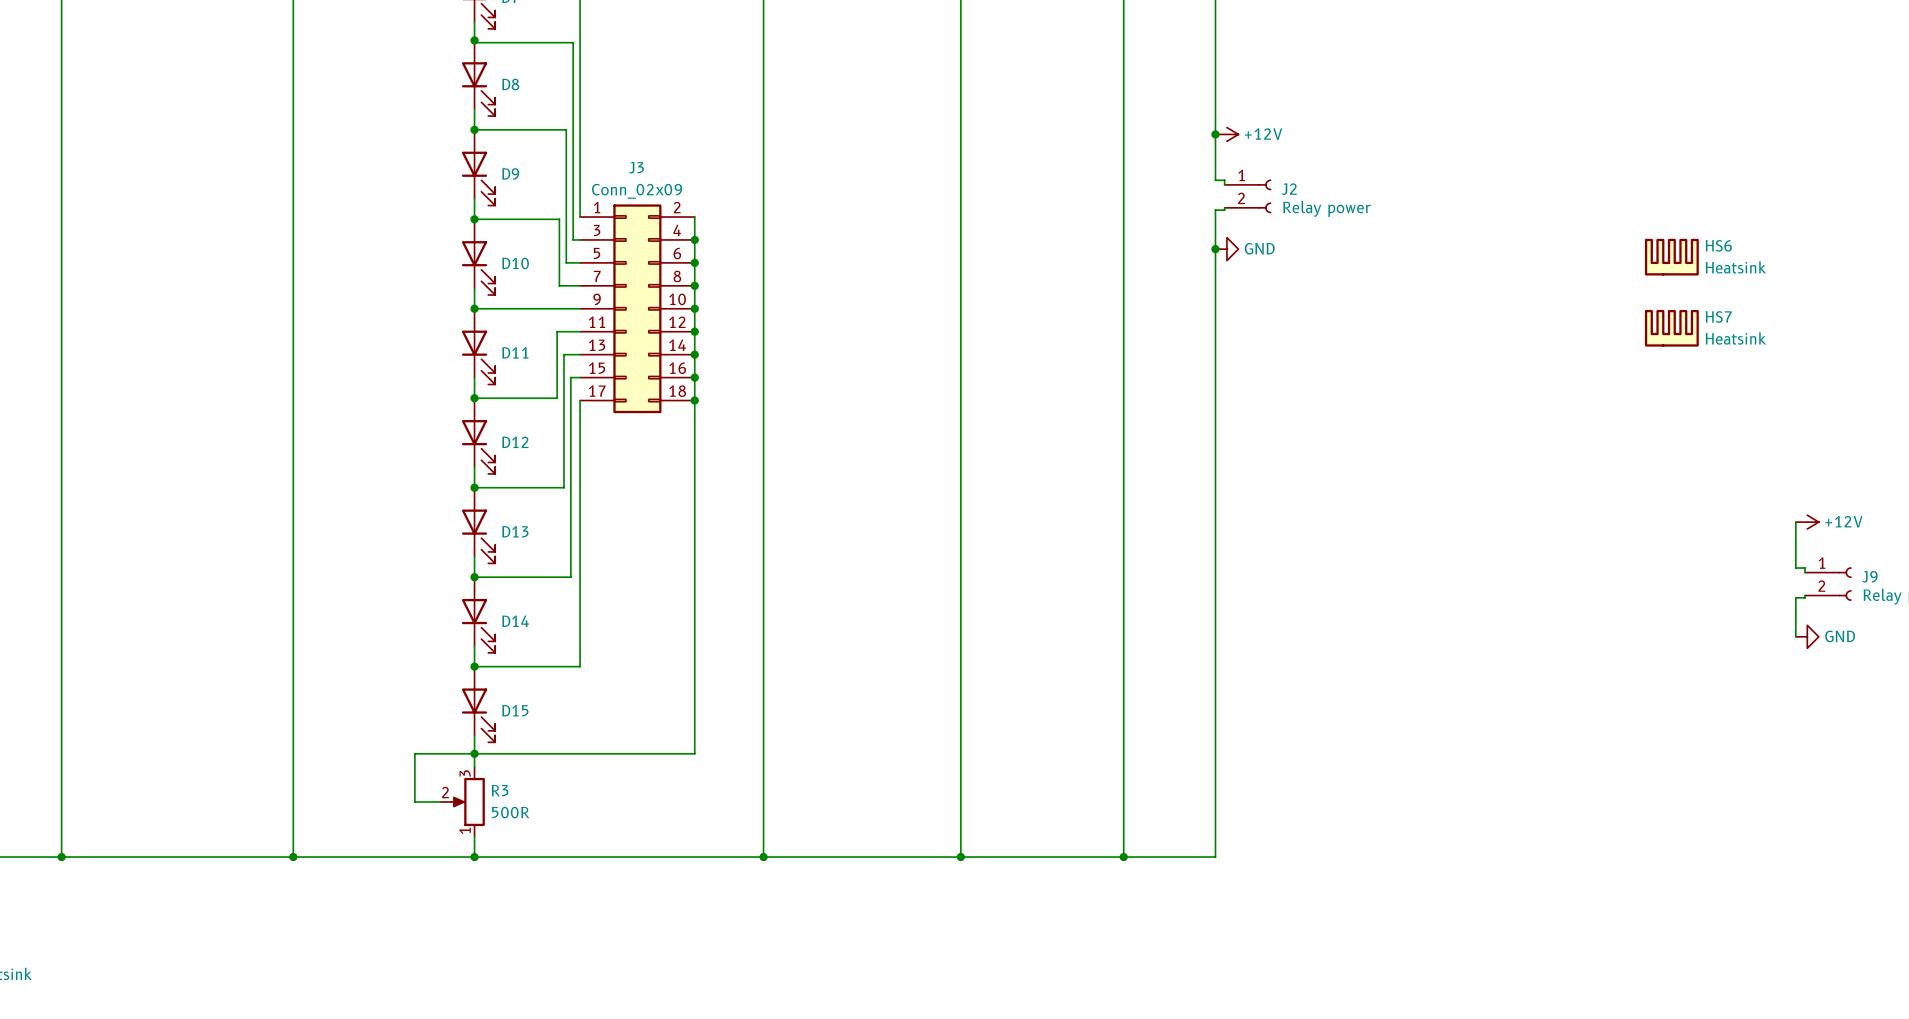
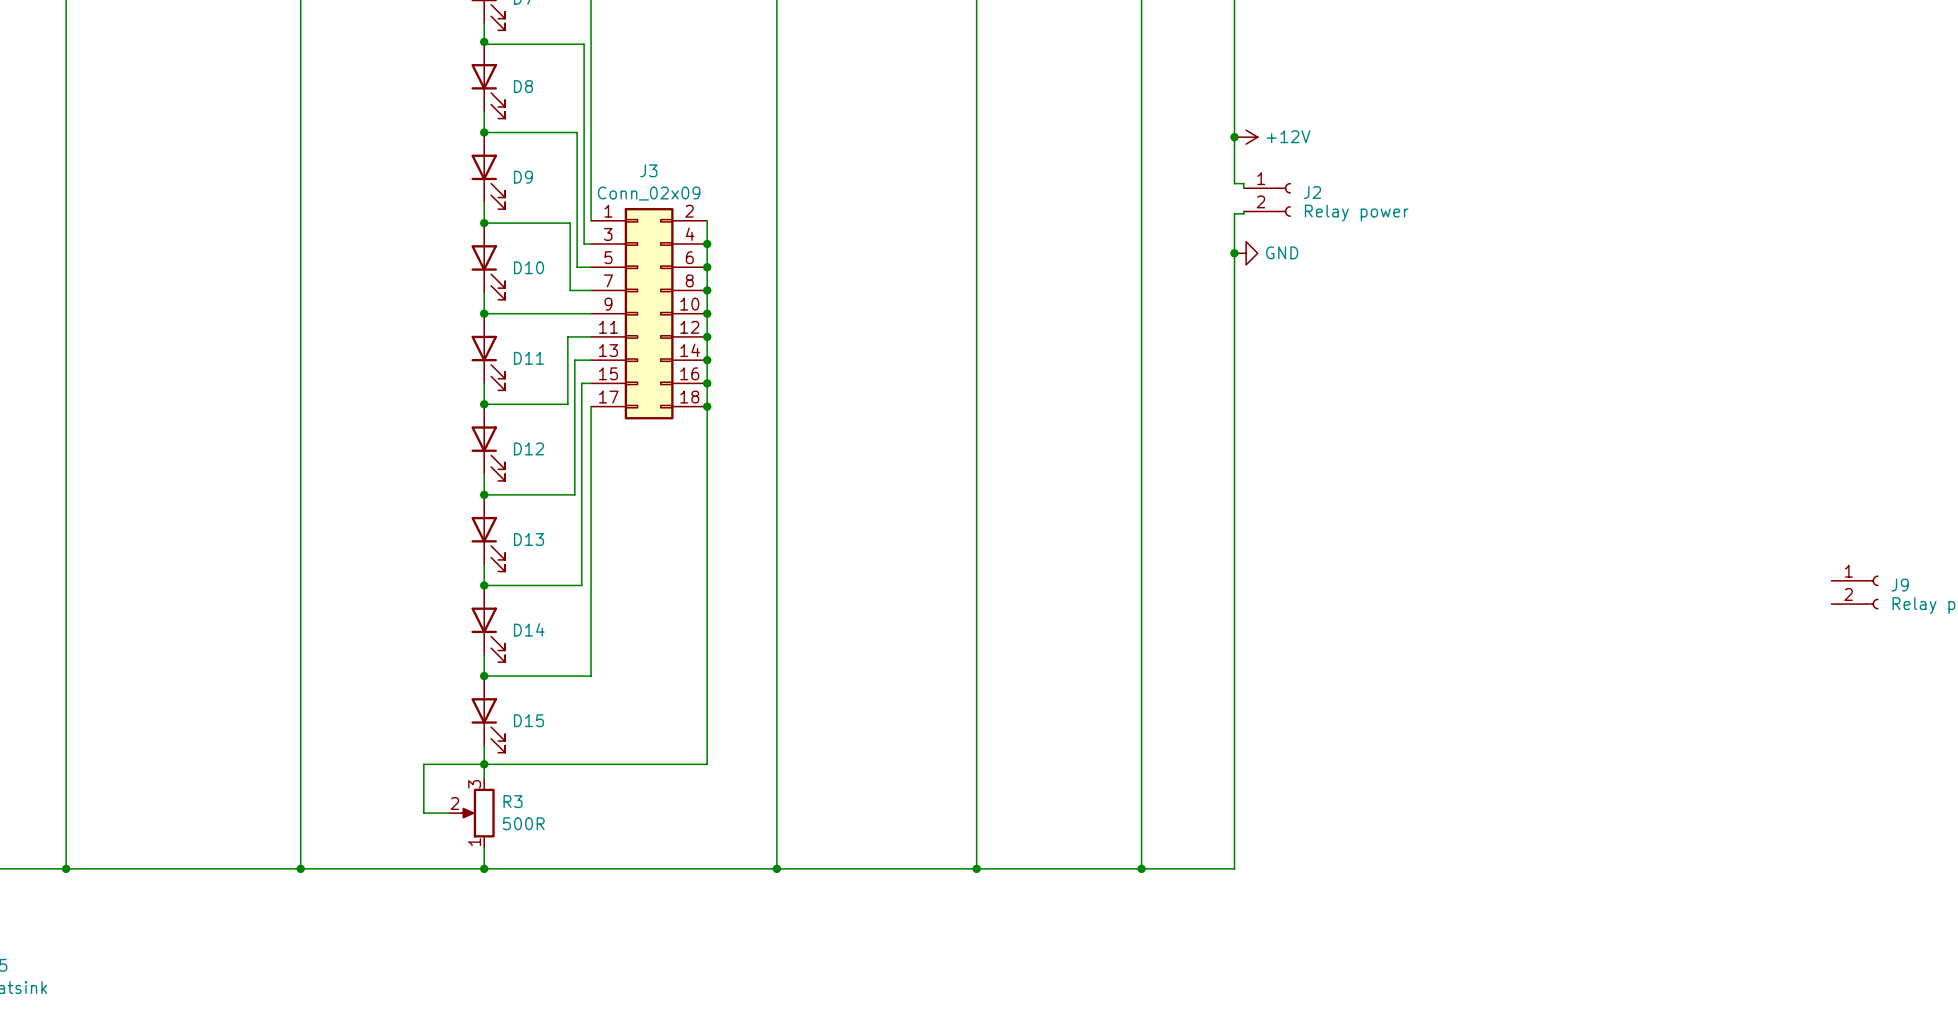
HS6: Heatsink (1671, 257) -> none
HS7: Heatsink (1671, 328) -> none
wire: (1795, 522) (1795, 567) (1805, 567) (1805, 572) -> none
power symbol: +12V (1807, 522) -> none
wire: (1805, 595) (1805, 597) (1795, 597) (1795, 636) -> none
power symbol: GND (1807, 636) -> none

